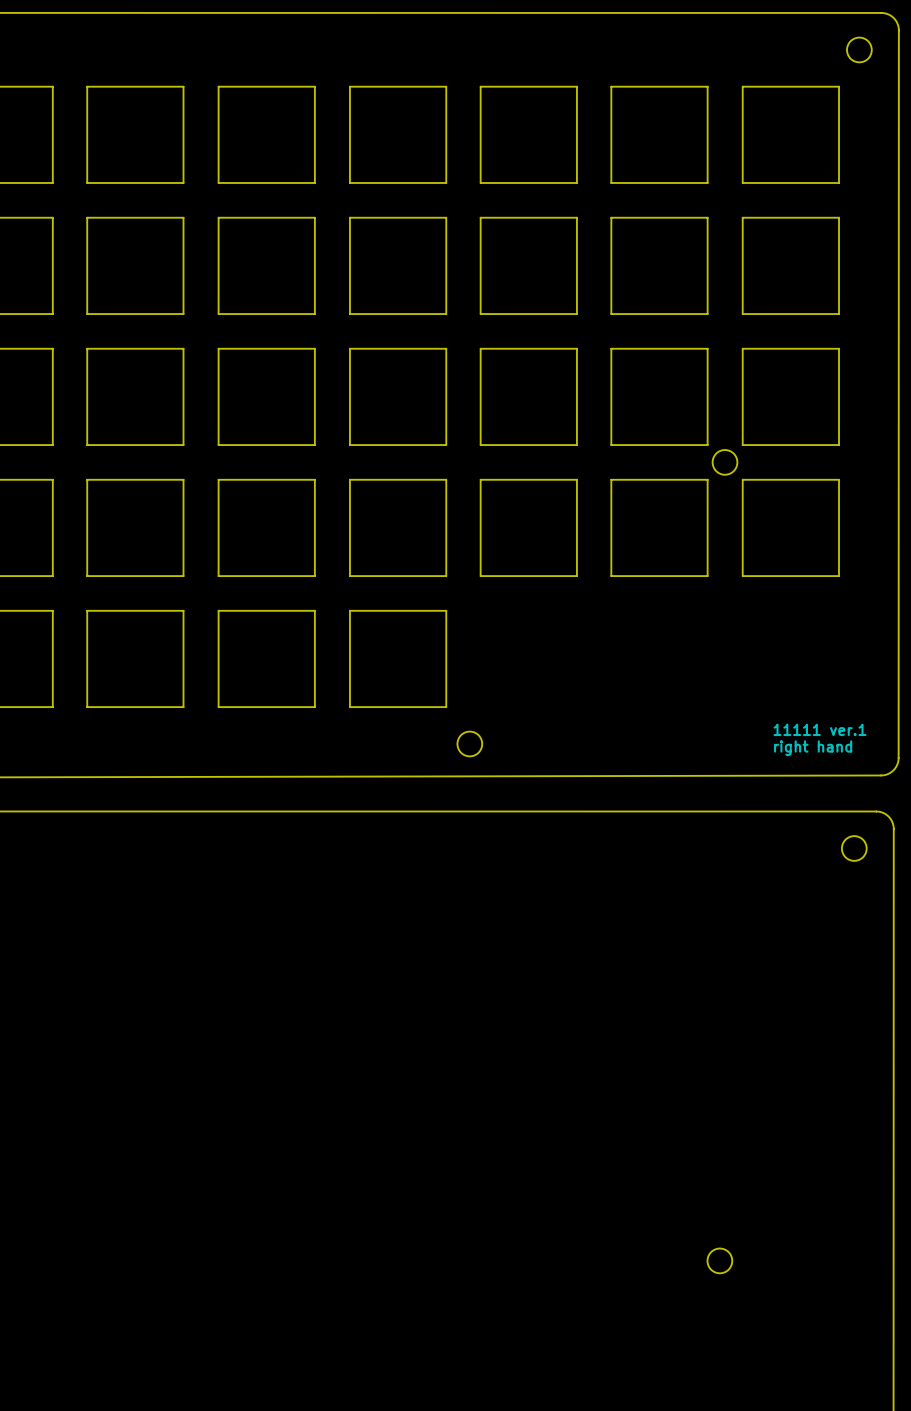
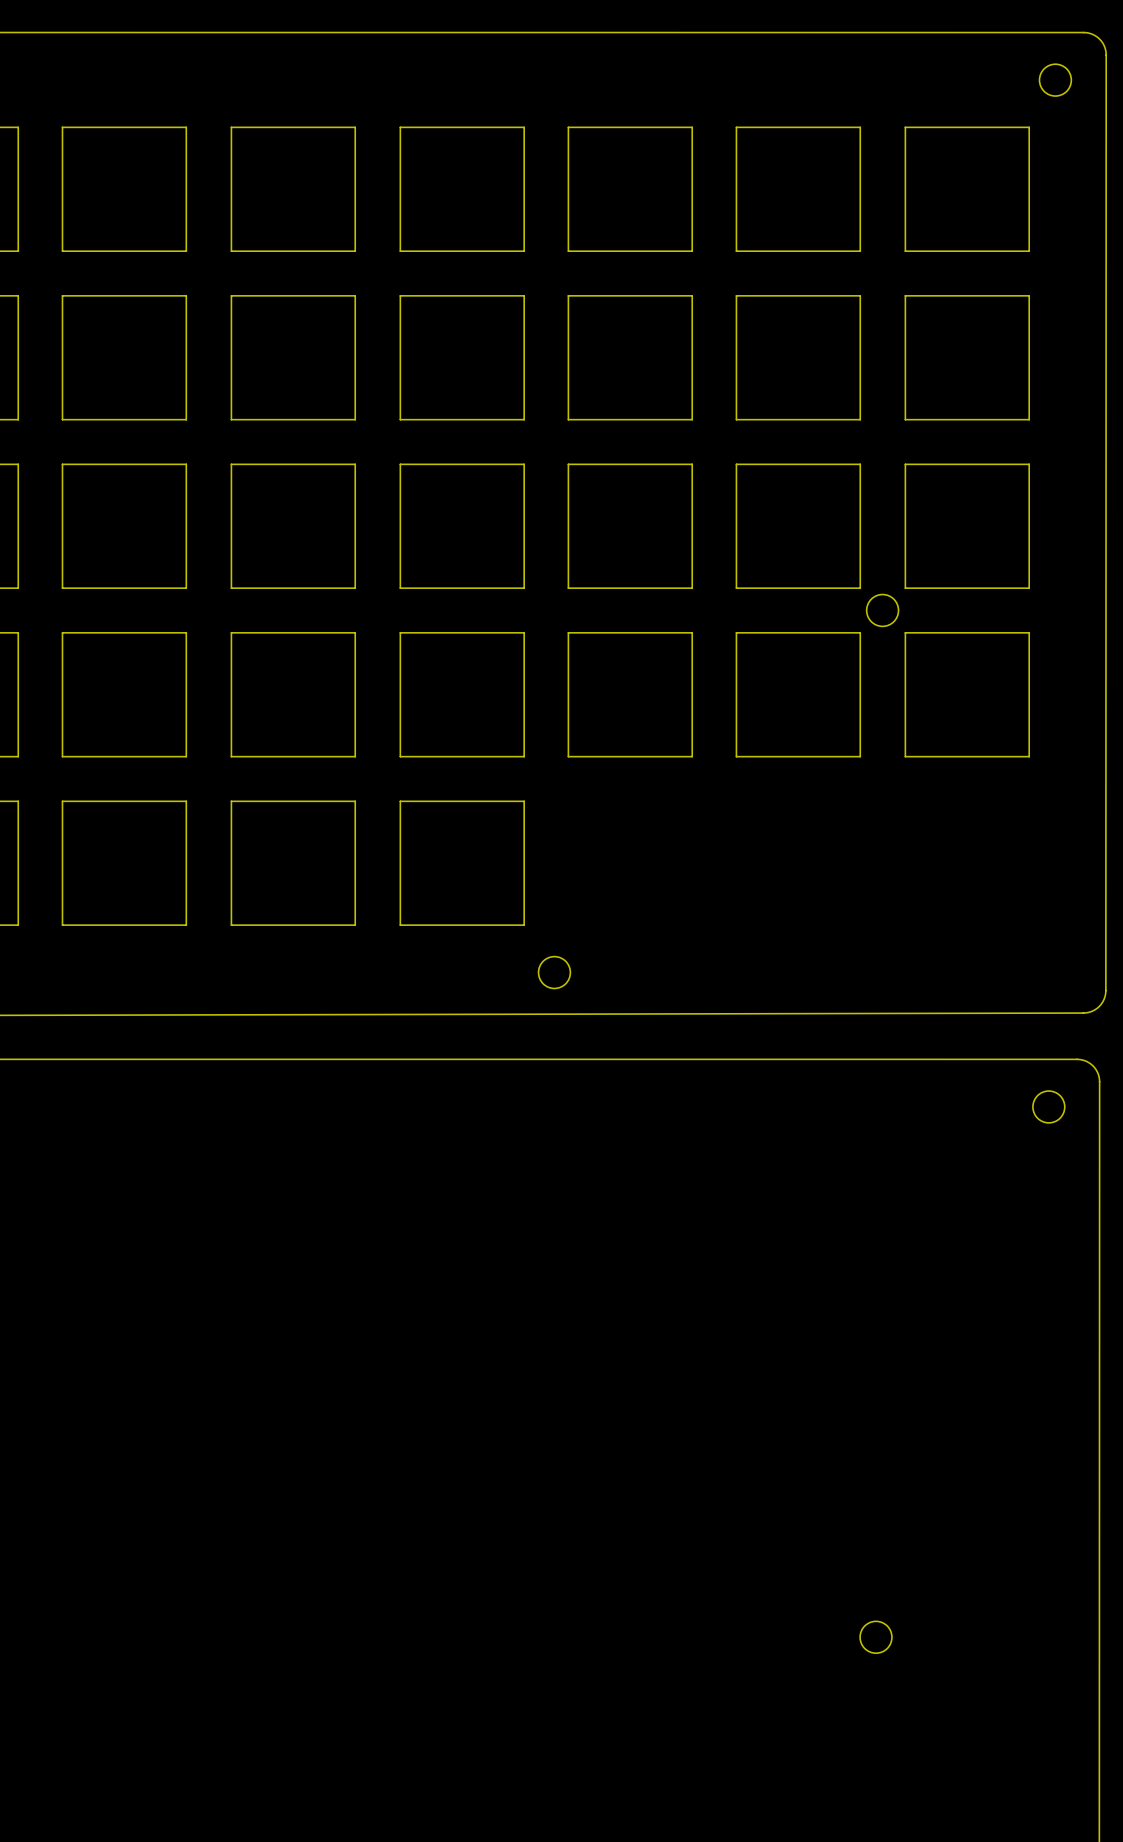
text: 11111 ver.1 (819, 729) -> none
text: right hand (813, 748) -> none

